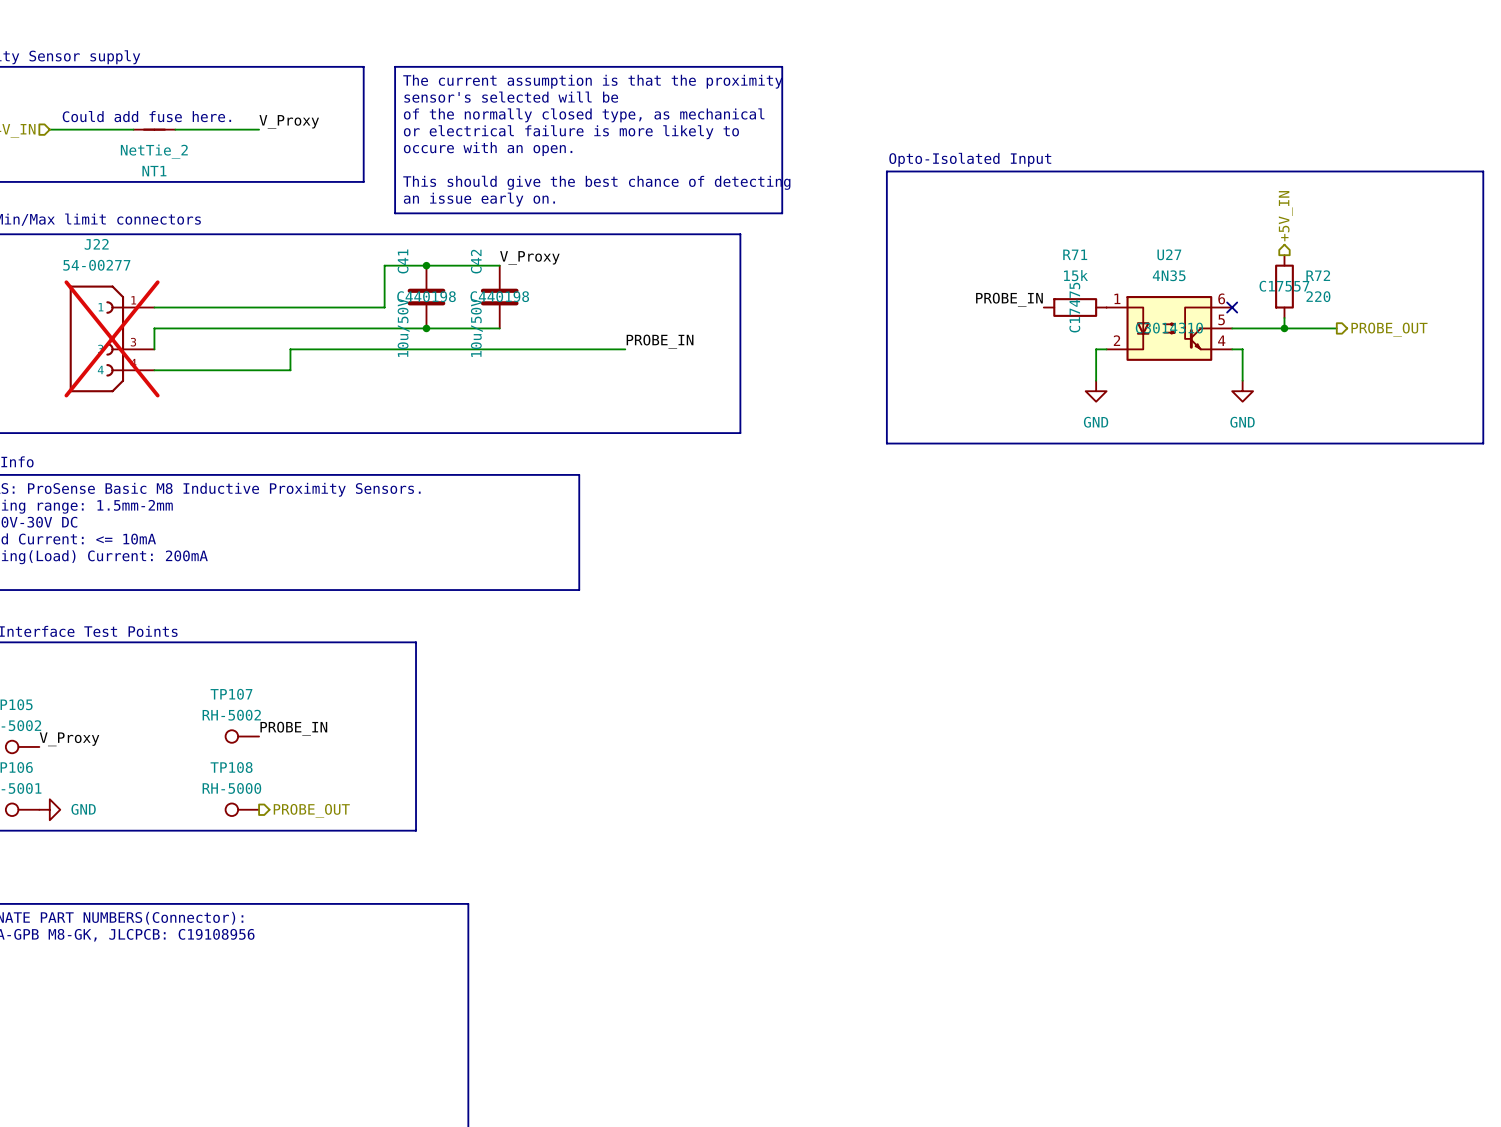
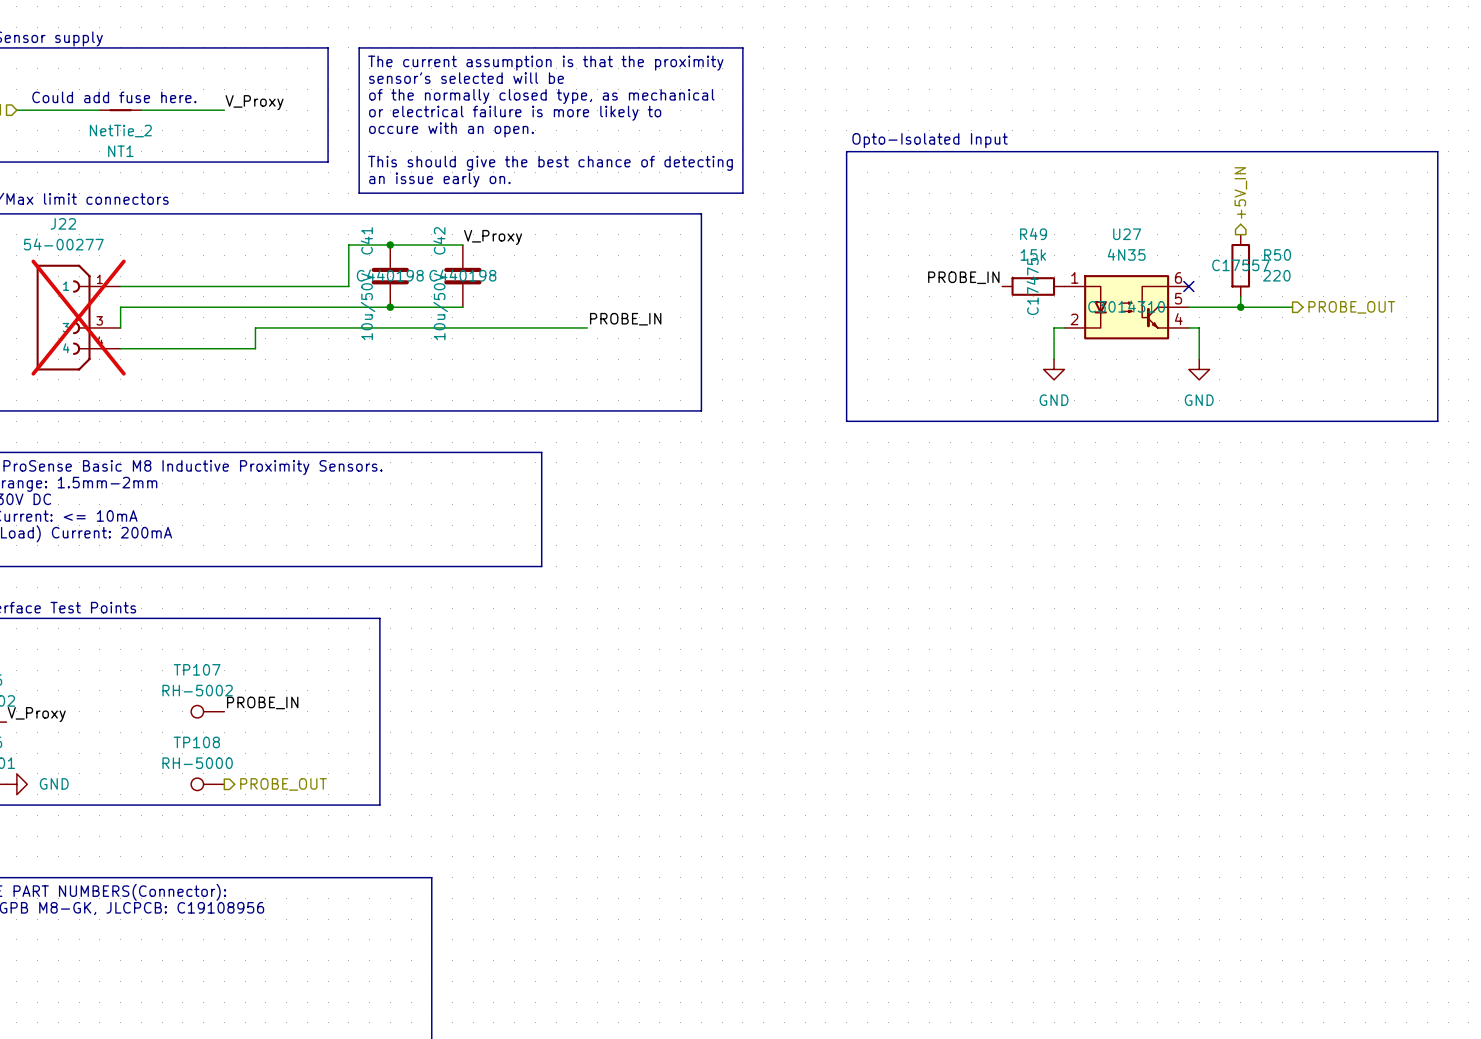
R71 name: R71 (1075, 254) -> R49 (1033, 234)
R72 name: R72 (1318, 275) -> R50 (1277, 254)

